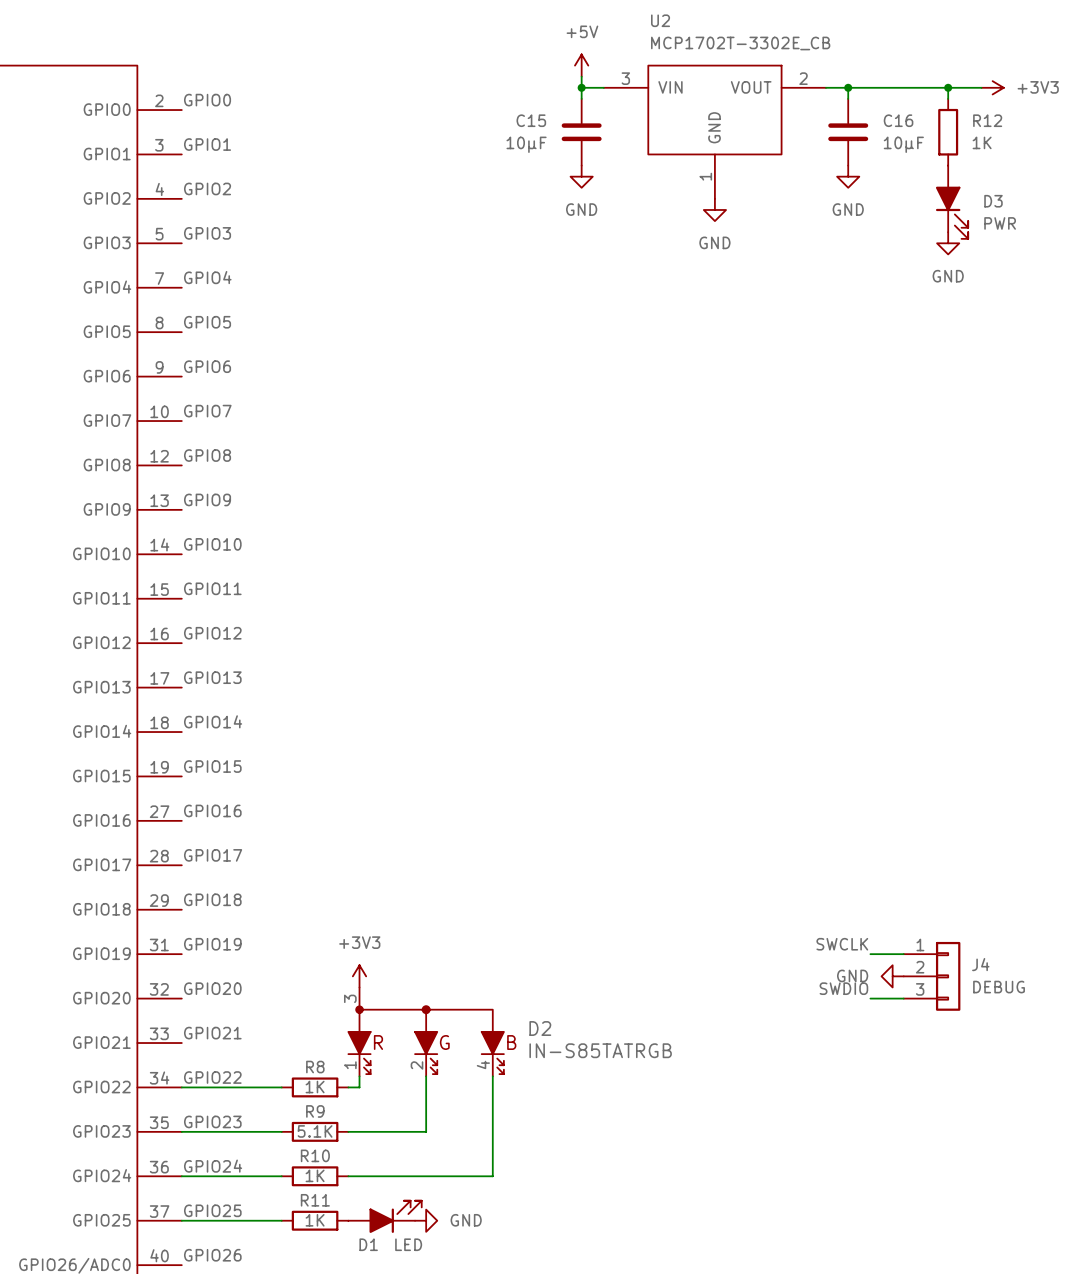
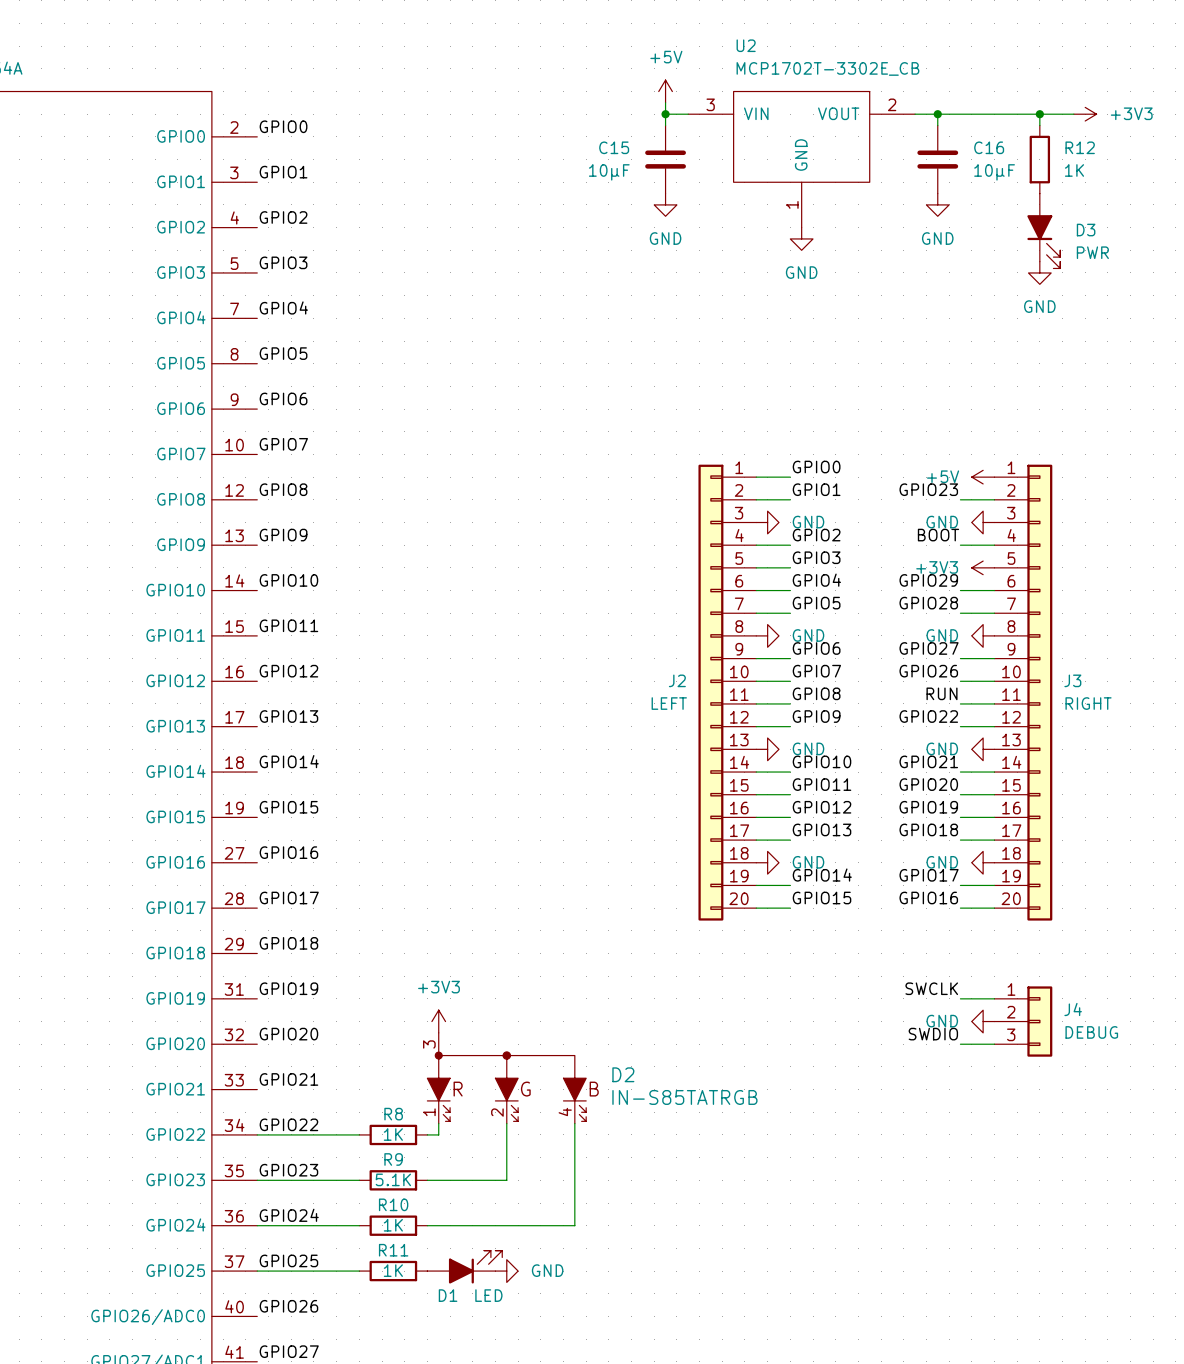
label: none -> GPIO0 (816, 467)
wire: none -> (756, 477) (790, 477)
power symbol: none -> +5V (983, 477)
label: none -> GPIO1 (816, 489)
label: none -> GPIO23 (928, 489)
wire: none -> (756, 499) (790, 499)
wire: none -> (960, 499) (994, 499)
power symbol: none -> GND (767, 522)
power symbol: none -> GND (983, 522)
label: none -> GPIO2 (816, 535)
label: none -> BOOT (938, 535)
wire: none -> (756, 545) (790, 545)
wire: none -> (960, 545) (994, 545)
label: none -> GPIO3 (816, 557)
wire: none -> (756, 567) (790, 567)
power symbol: none -> +3V3 (983, 567)
label: none -> GPIO4 (816, 580)
label: none -> GPIO29 (928, 580)
wire: none -> (756, 590) (790, 590)
wire: none -> (960, 590) (994, 590)
label: none -> GPIO5 (816, 603)
label: none -> GPIO28 (928, 603)
wire: none -> (756, 613) (790, 613)
wire: none -> (960, 613) (994, 613)
power symbol: none -> GND (767, 635)
power symbol: none -> GND (983, 635)
label: none -> GPIO6 (816, 648)
label: none -> GPIO27 (929, 648)
wire: none -> (756, 658) (790, 658)
wire: none -> (960, 658) (994, 658)
label: none -> GPIO7 (816, 671)
label: none -> GPIO26 (928, 671)
wire: none -> (756, 681) (790, 681)
wire: none -> (960, 681) (994, 681)
J2: none -> LEFT (727, 692)
J3: none -> RIGHT (1023, 692)
label: none -> GPIO8 (816, 693)
label: none -> RUN (942, 693)
wire: none -> (756, 703) (790, 703)
wire: none -> (960, 703) (994, 703)
label: none -> GPIO9 (816, 716)
label: none -> GPIO22 (928, 716)
wire: none -> (756, 726) (790, 726)
wire: none -> (960, 726) (994, 726)
power symbol: none -> GND (767, 749)
power symbol: none -> GND (983, 749)
label: none -> GPIO10 (822, 761)
label: none -> GPIO21 (928, 761)
wire: none -> (756, 772) (790, 772)
wire: none -> (960, 772) (994, 772)
label: none -> GPIO11 (822, 784)
label: none -> GPIO20 (928, 784)
wire: none -> (756, 794) (790, 794)
wire: none -> (960, 794) (994, 794)
label: none -> GPIO12 (822, 807)
label: none -> GPIO19 (928, 807)
wire: none -> (756, 817) (790, 817)
wire: none -> (960, 817) (994, 817)
label: none -> GPIO13 (822, 829)
label: none -> GPIO18 (928, 829)
wire: none -> (756, 840) (790, 840)
wire: none -> (960, 840) (994, 840)
power symbol: none -> GND (767, 862)
power symbol: none -> GND (983, 862)
label: none -> GPIO14 (822, 875)
label: none -> GPIO17 (929, 875)
wire: none -> (756, 885) (790, 885)
wire: none -> (960, 885) (994, 885)
label: none -> GPIO15 (822, 898)
label: none -> GPIO16 (928, 898)
wire: none -> (756, 908) (790, 908)
wire: none -> (960, 908) (994, 908)

